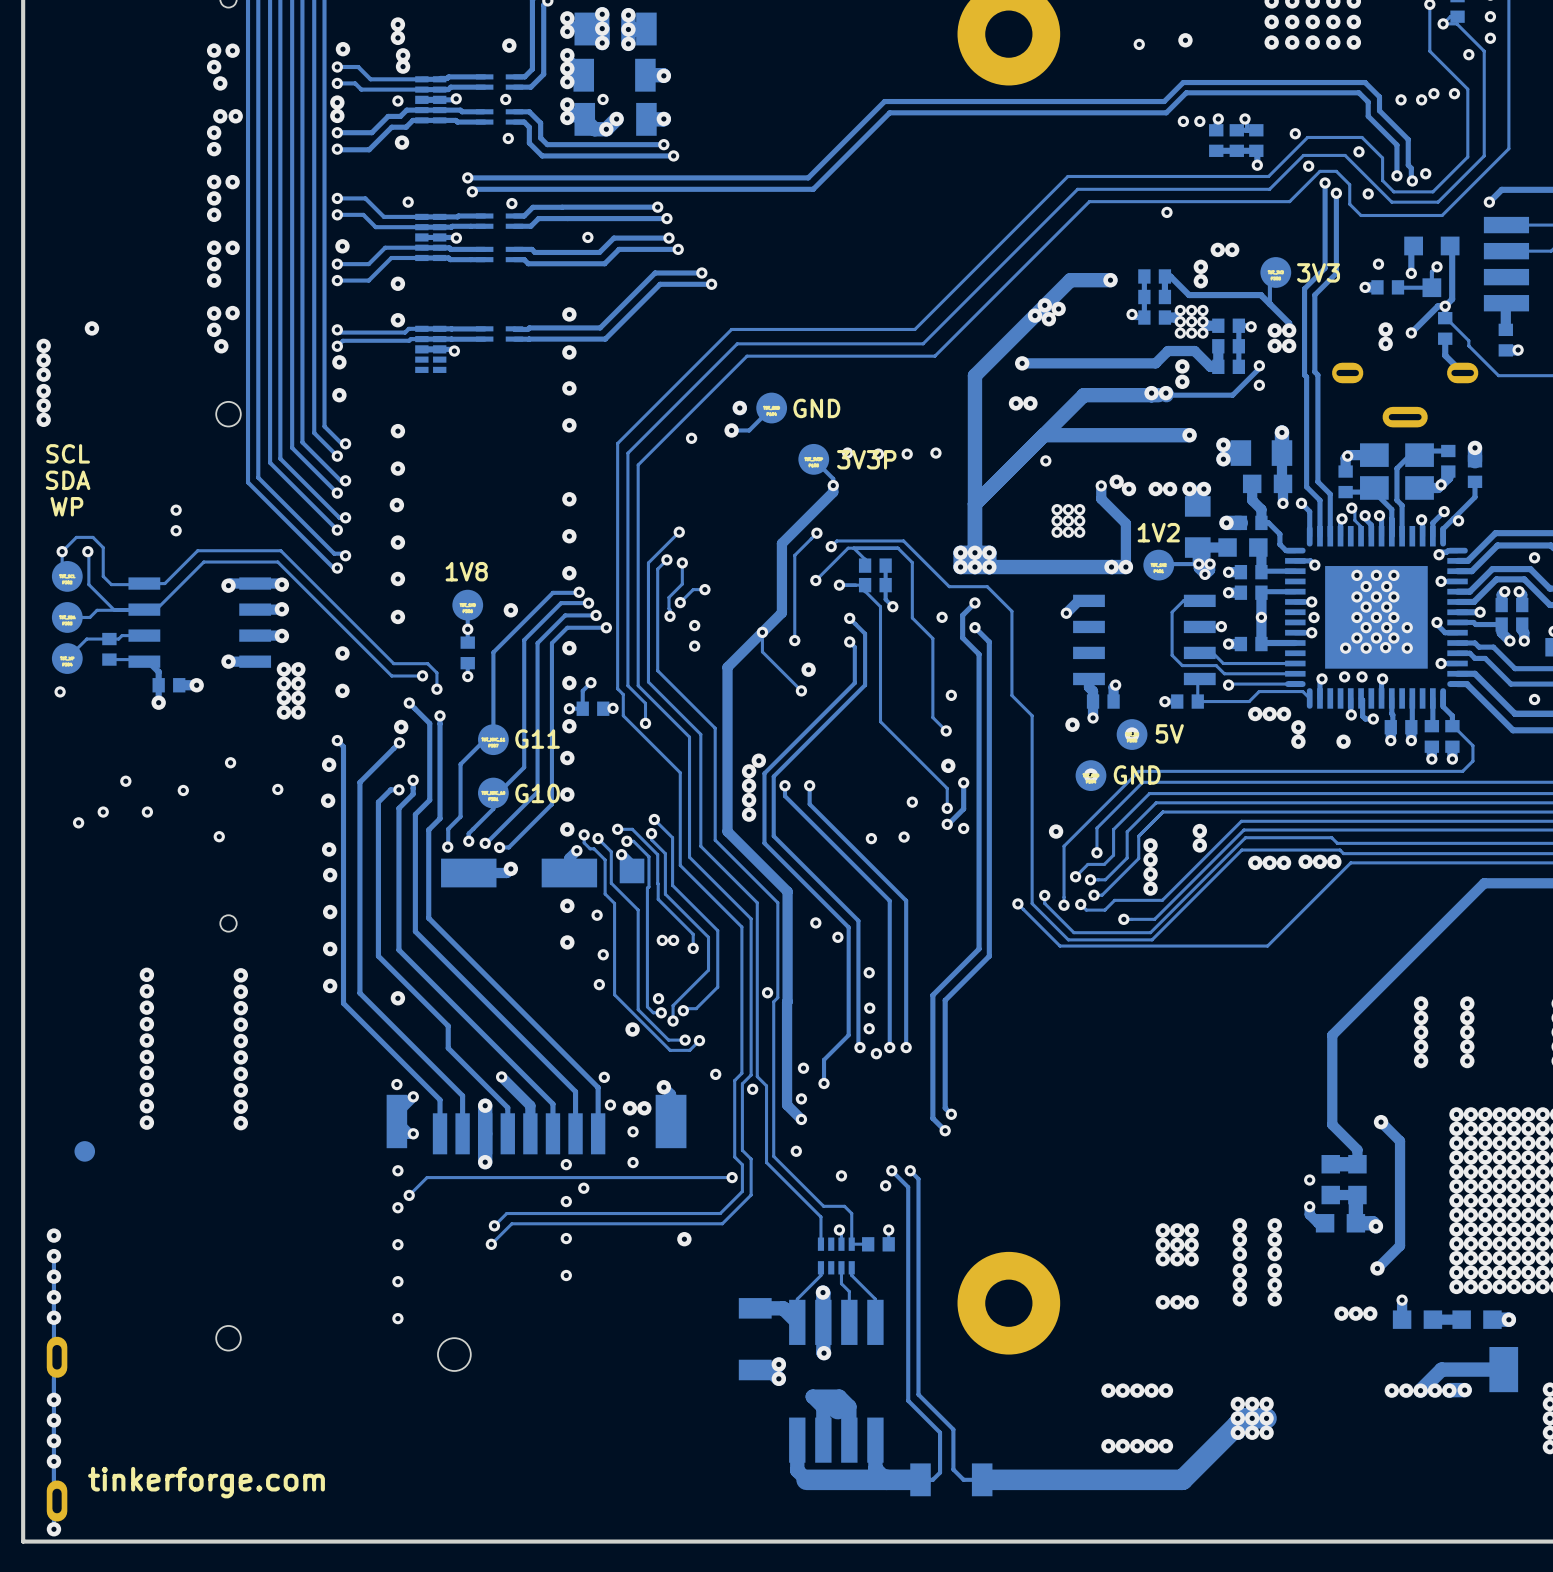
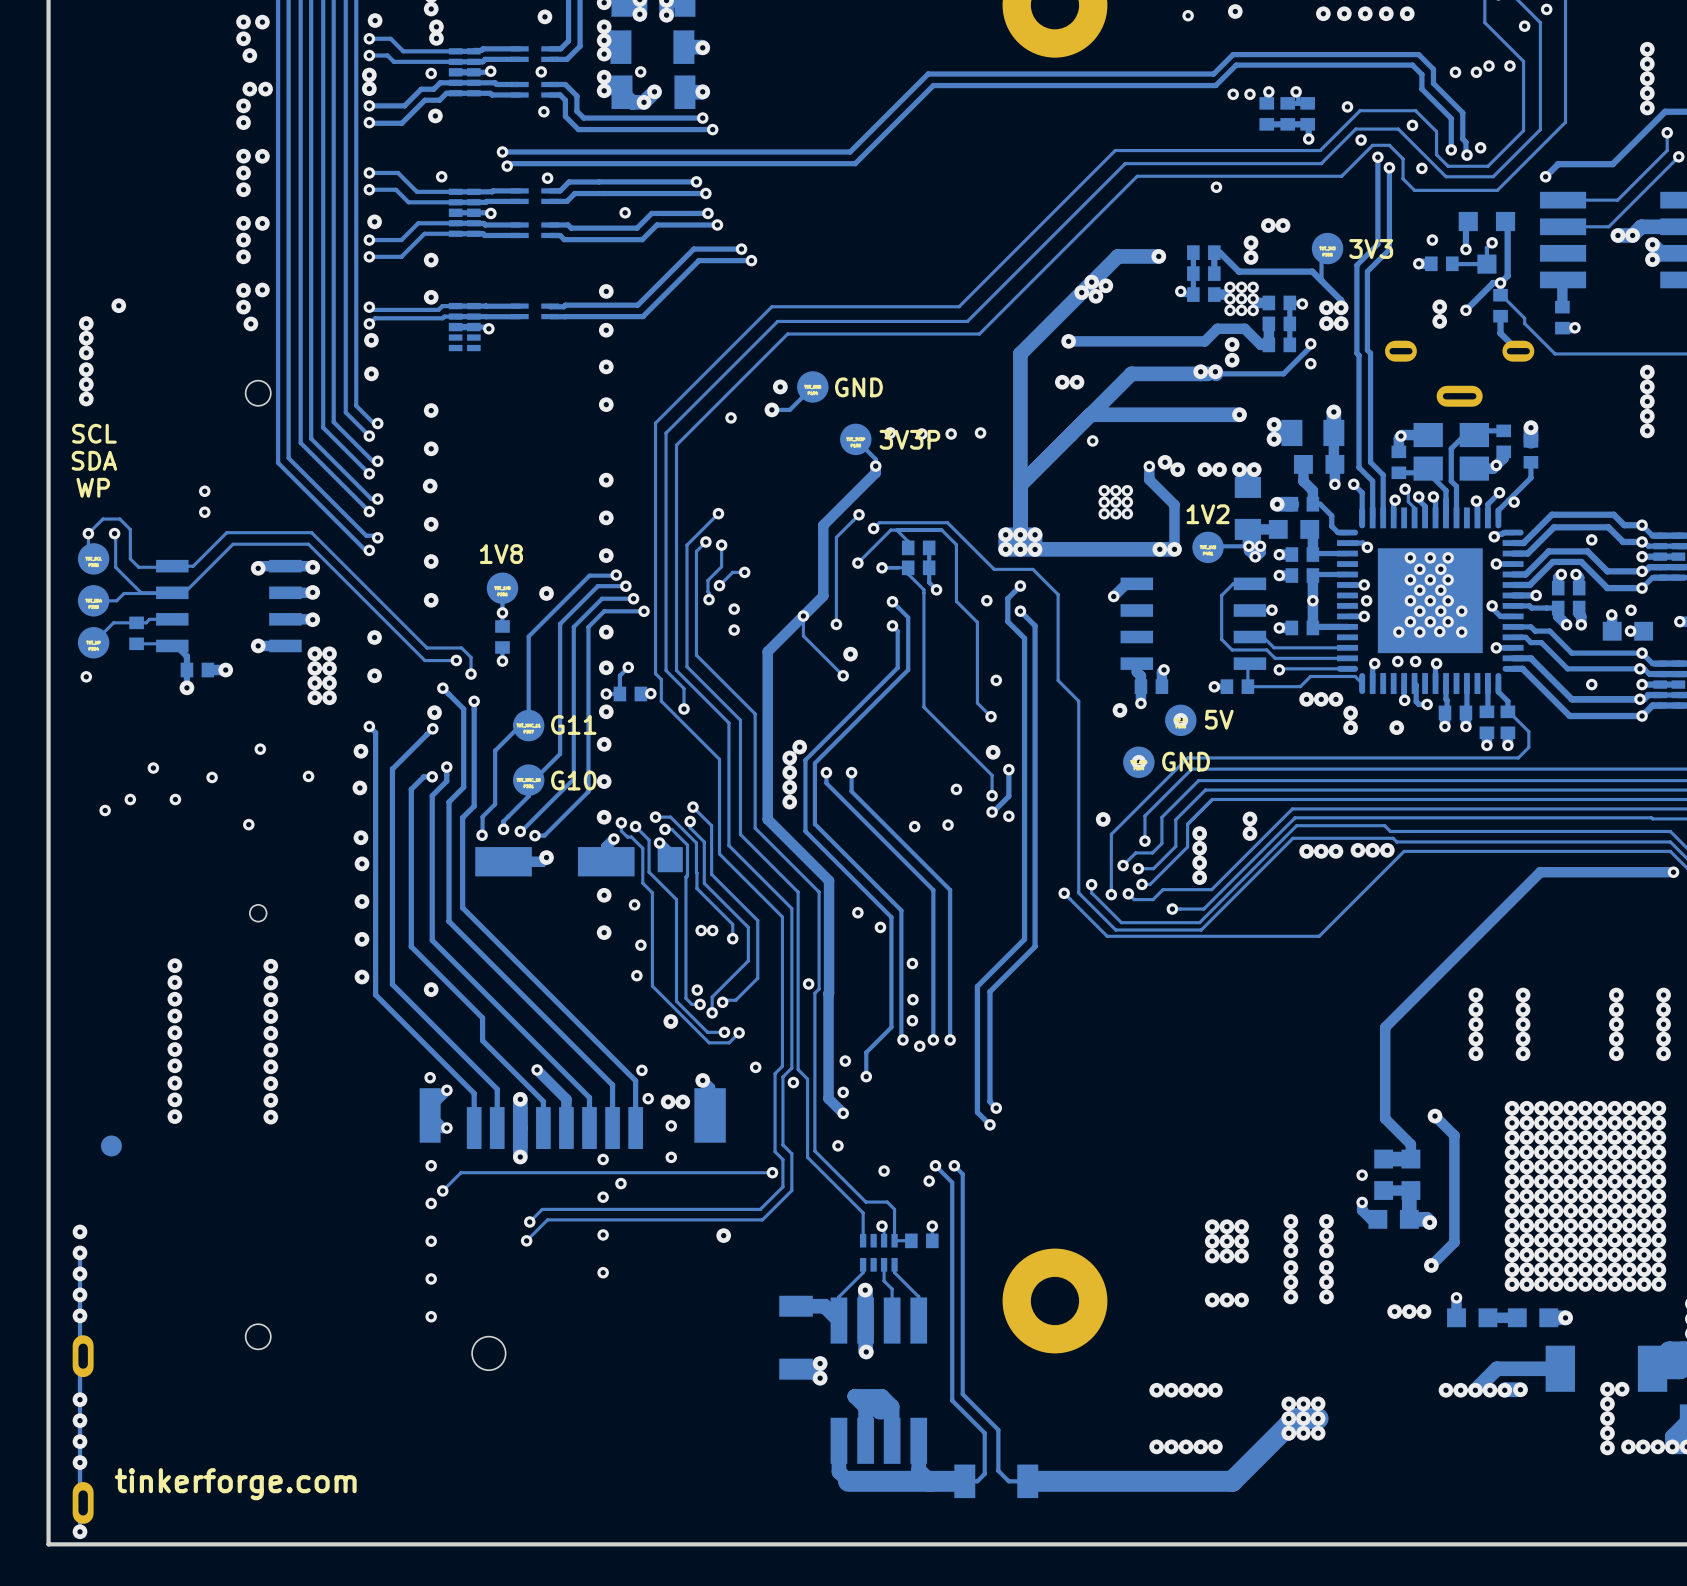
via: (43, 345) -> none
via: none -> (86, 323)
via: (43, 360) -> none
via: none -> (86, 338)
via: (43, 374) -> none
via: none -> (86, 352)
via: (43, 391) -> none
via: none -> (86, 369)
via: (43, 405) -> none
via: none -> (86, 384)
via: (43, 419) -> none
via: none -> (86, 399)

